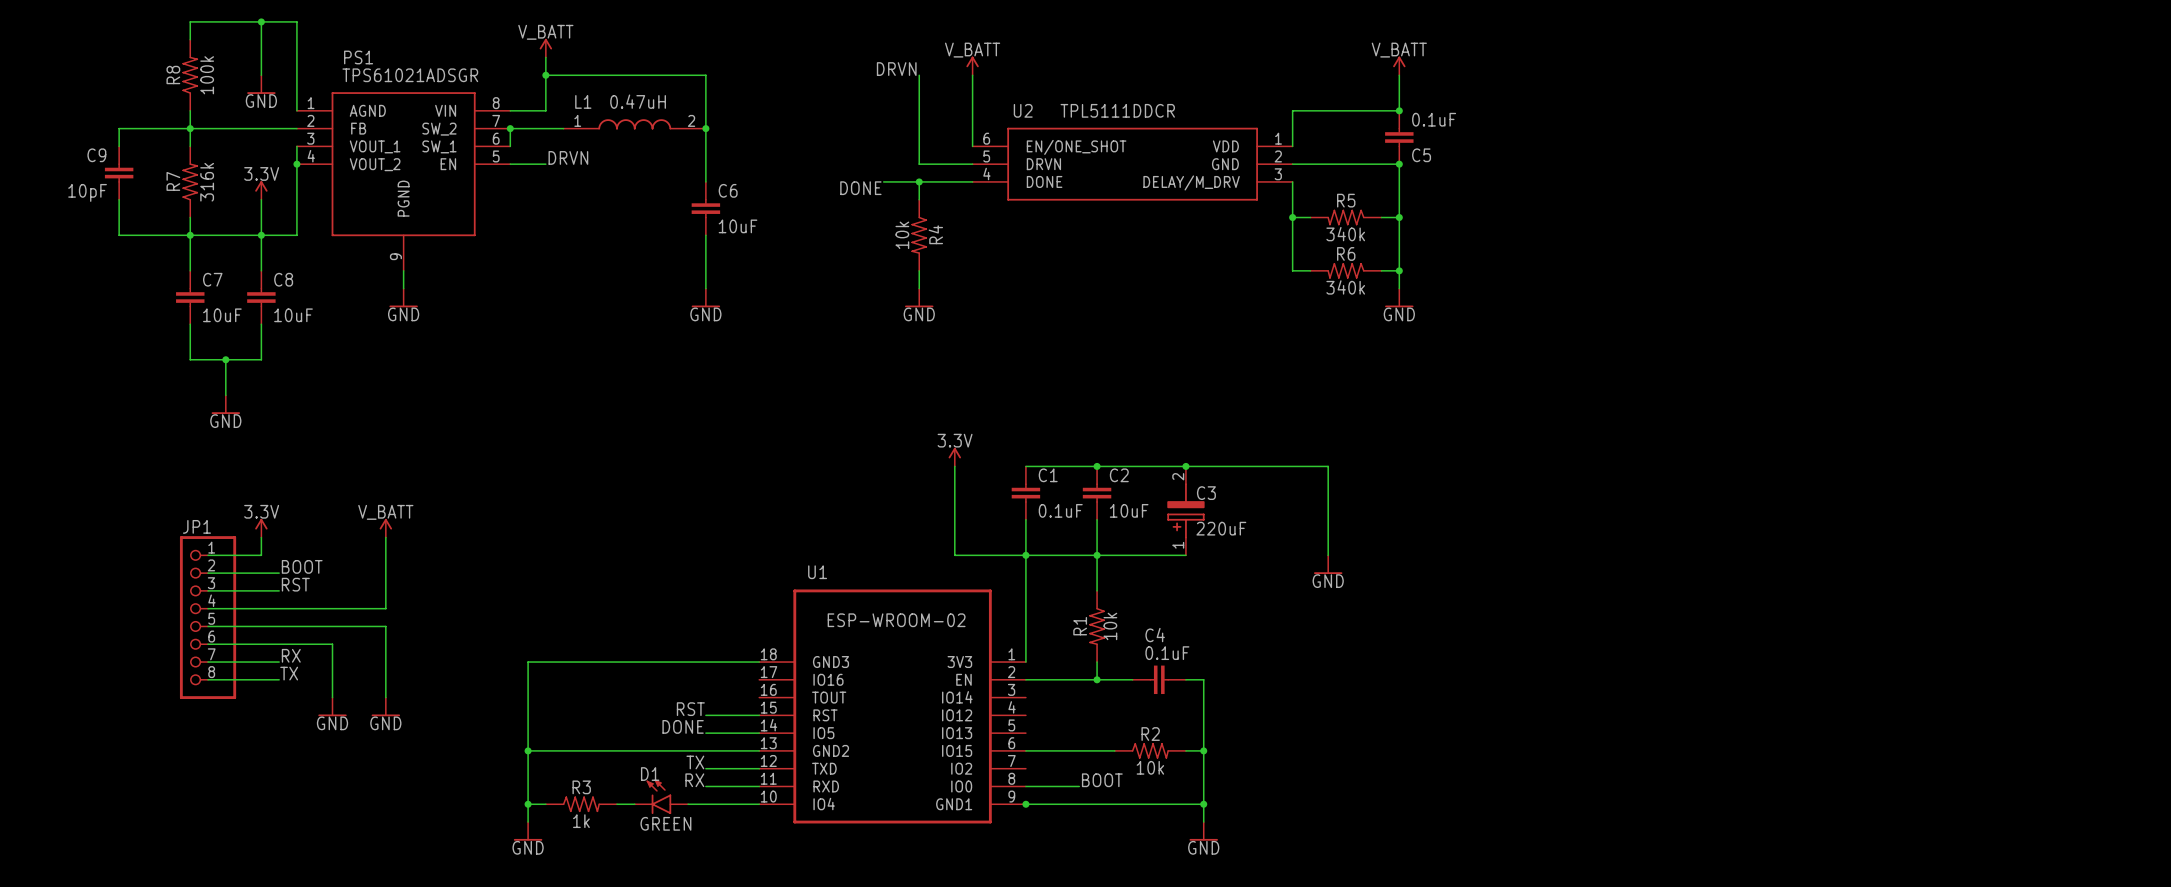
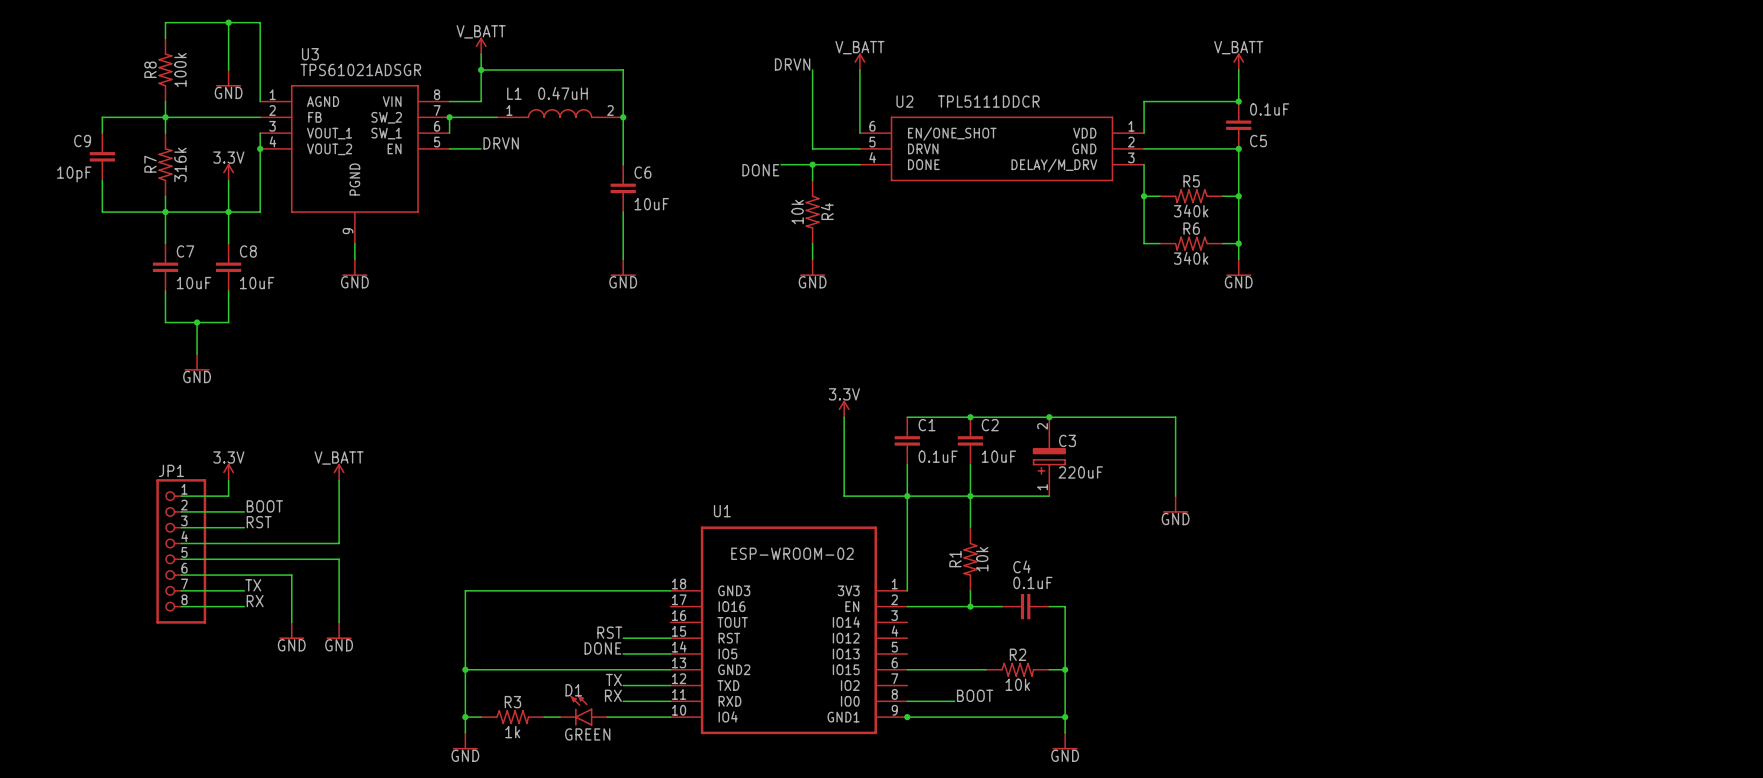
PS1 name: PS1 (358, 57) -> U3 (310, 54)
label: RX (291, 655) -> TX (253, 585)
label: TX (289, 673) -> RX (255, 601)

